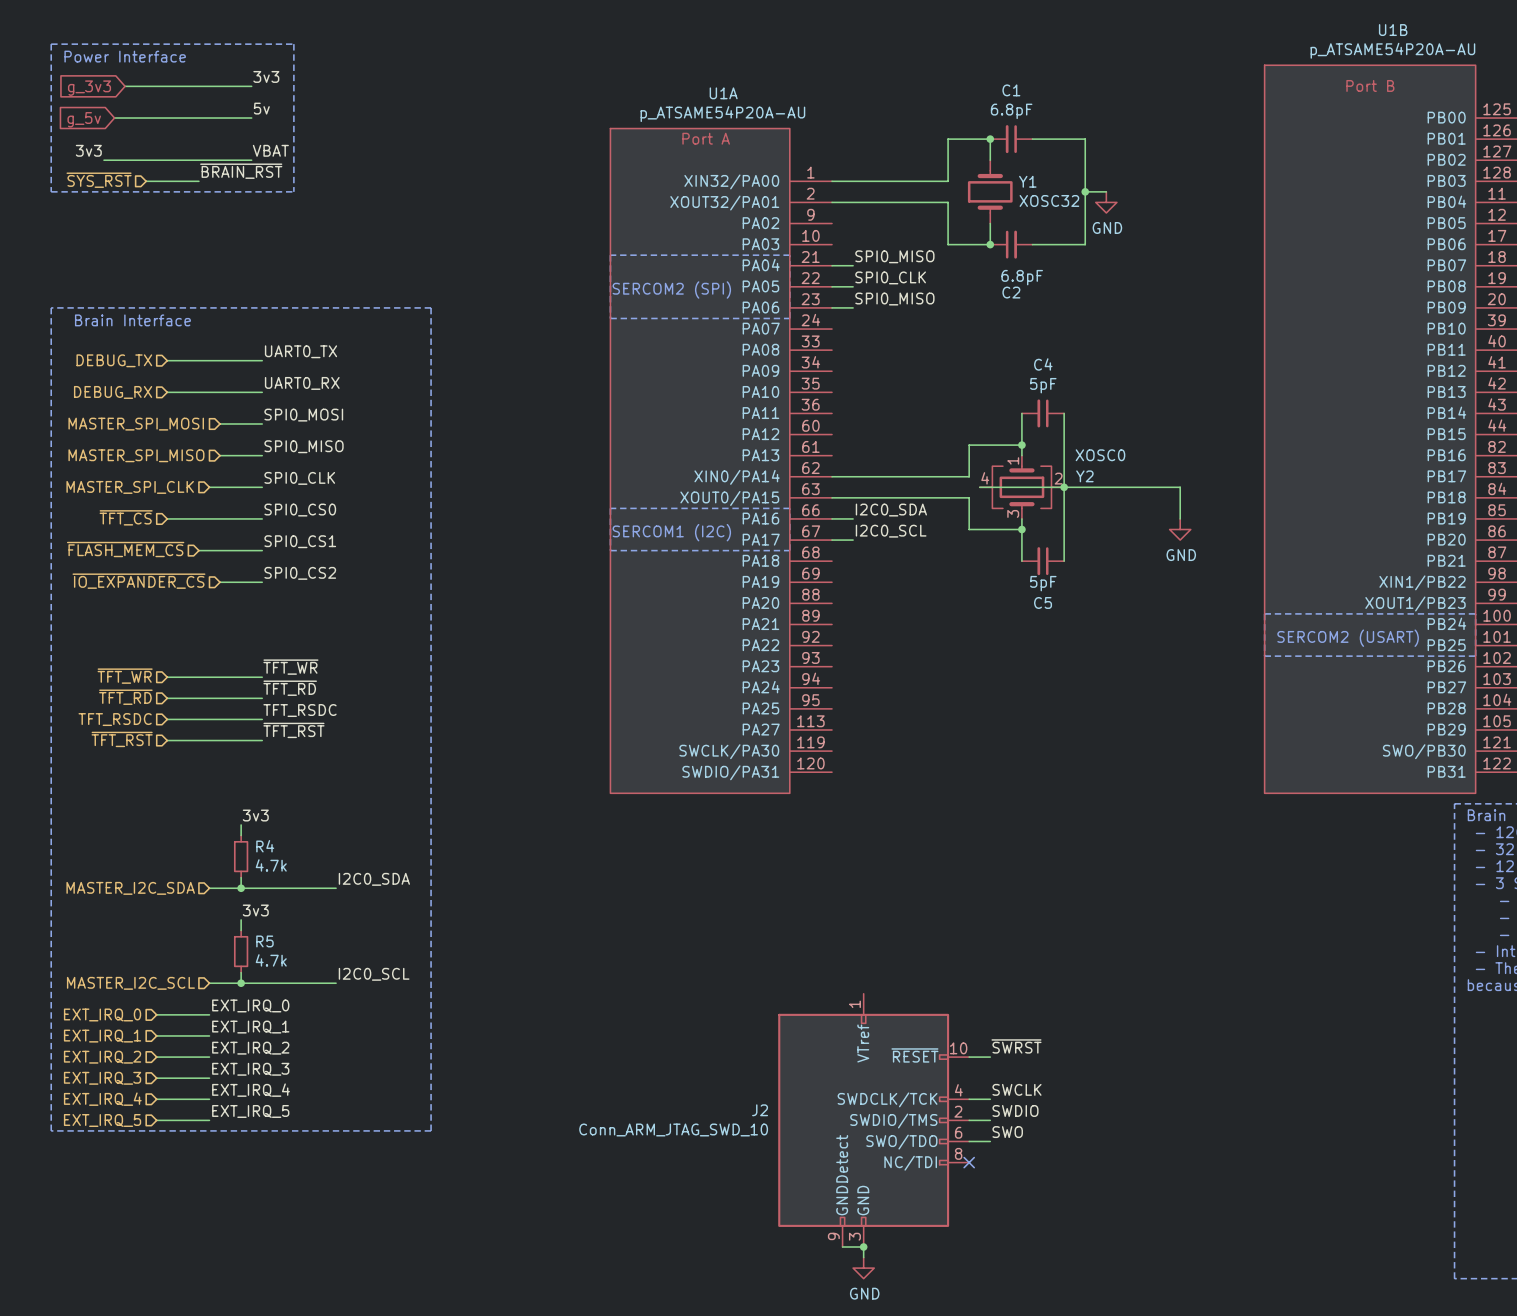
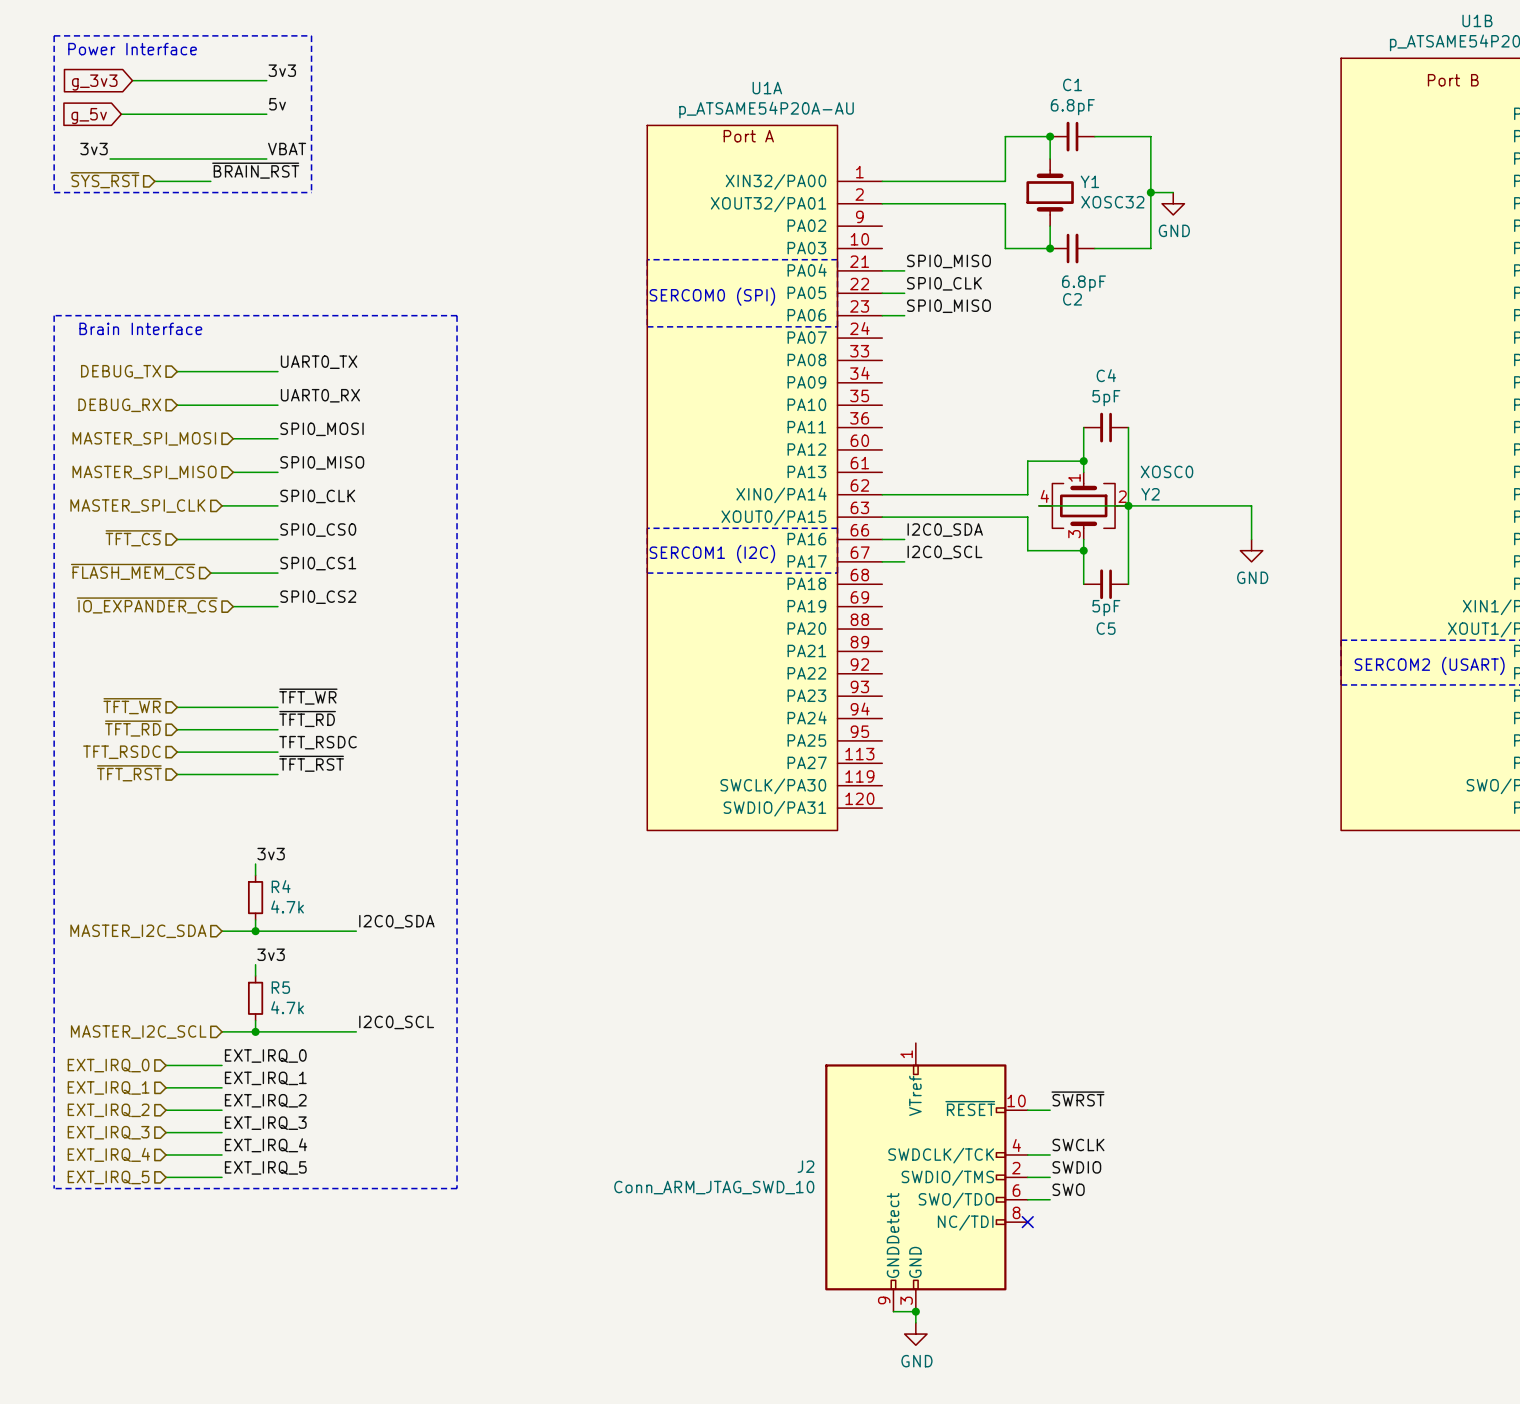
text: SERCOM2 (SPI) (671, 289) -> SERCOM0 (SPI) (712, 296)

